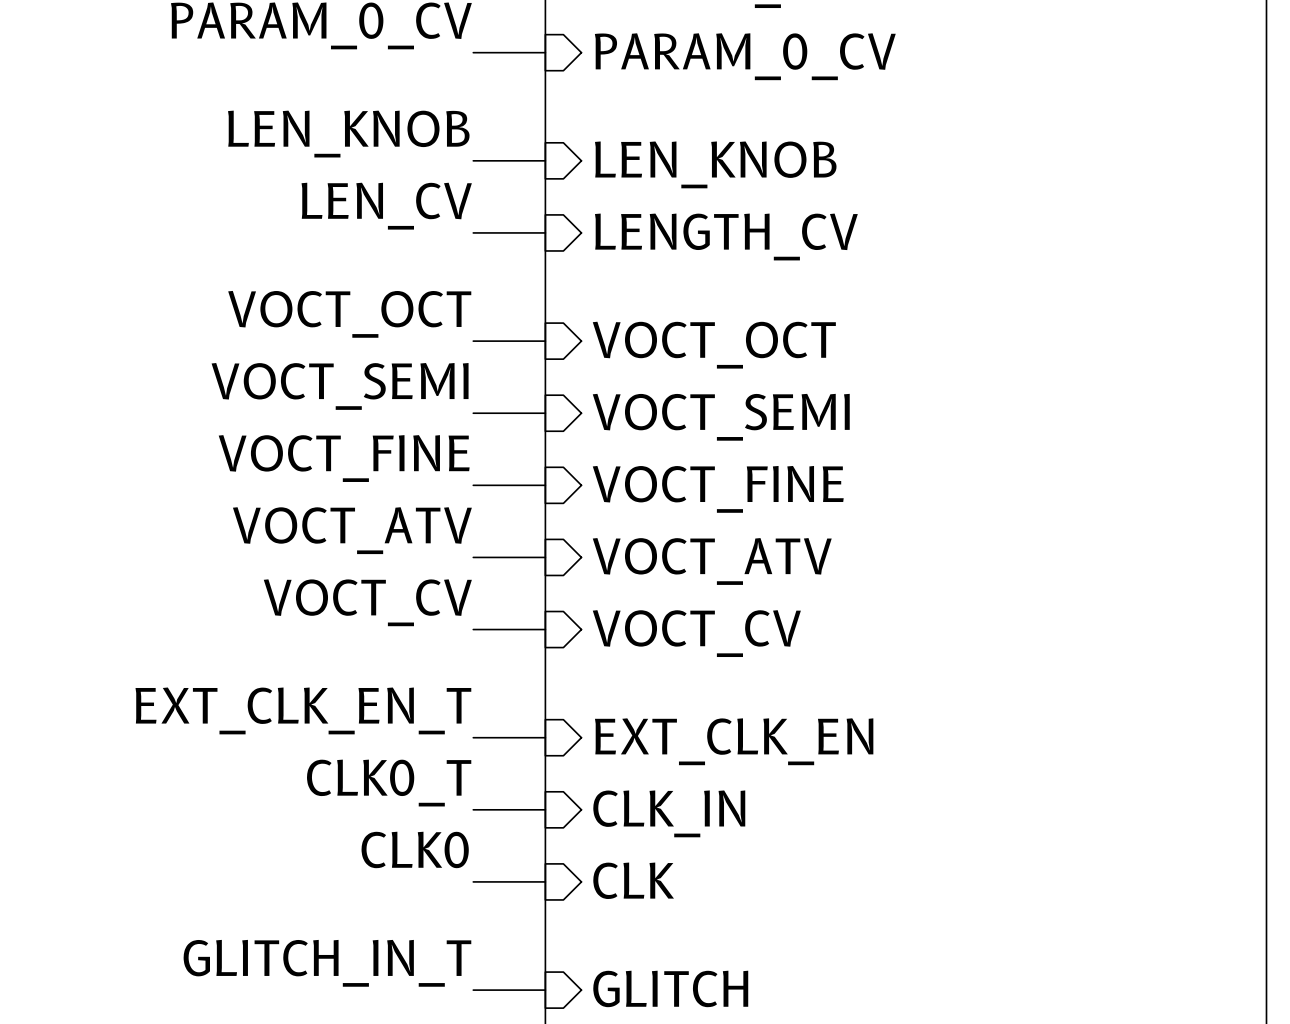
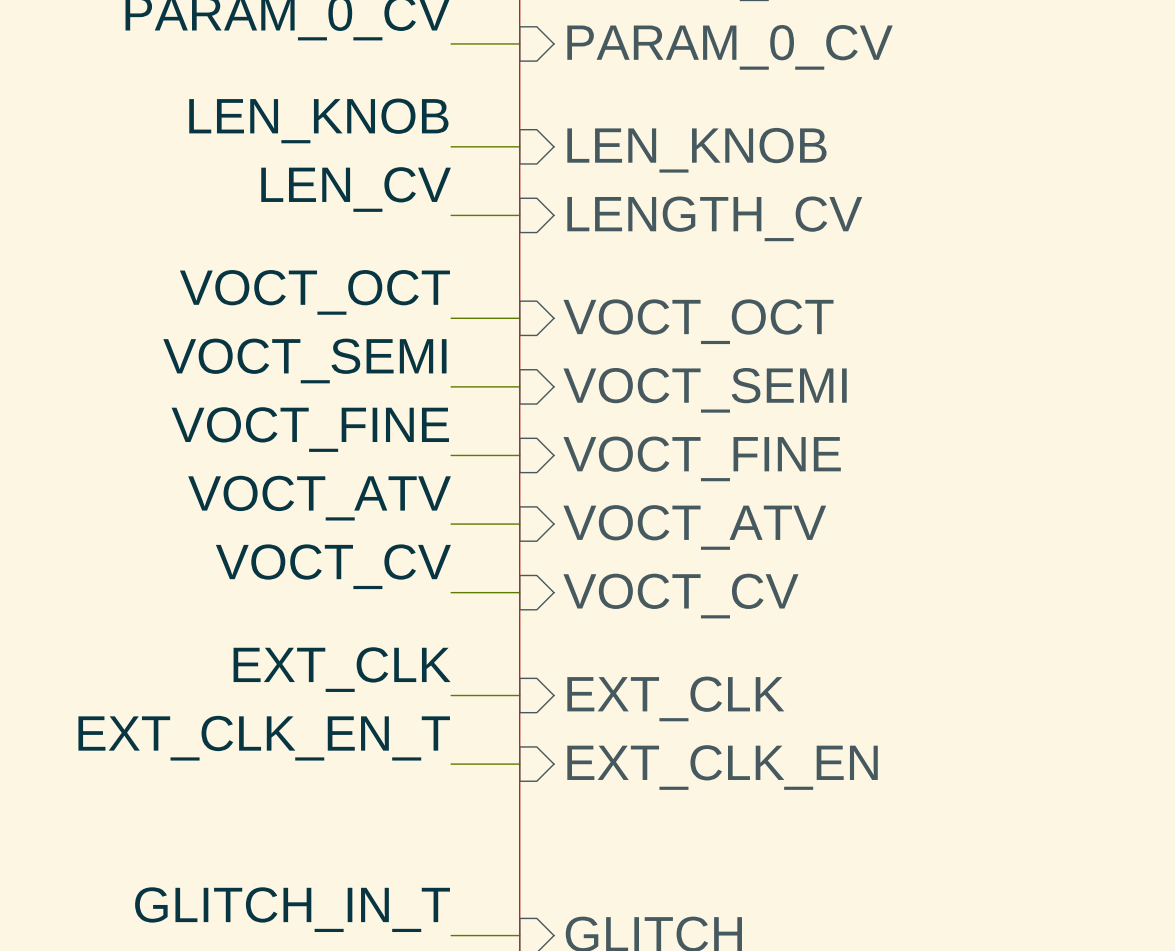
label: EXT_CLK_EN_T (303, 710) -> EXT_CLK (342, 669)
sheet pin: EXT_CLK_EN (734, 741) -> EXT_CLK (675, 698)
label: CLK0_T (389, 783) -> EXT_CLK_EN_T (264, 738)
sheet pin: CLK_IN (669, 813) -> EXT_CLK_EN (722, 767)
label: CLK0 (415, 849) -> none
sheet pin: CLK (633, 880) -> none
wire: (473, 881) (545, 881) -> none

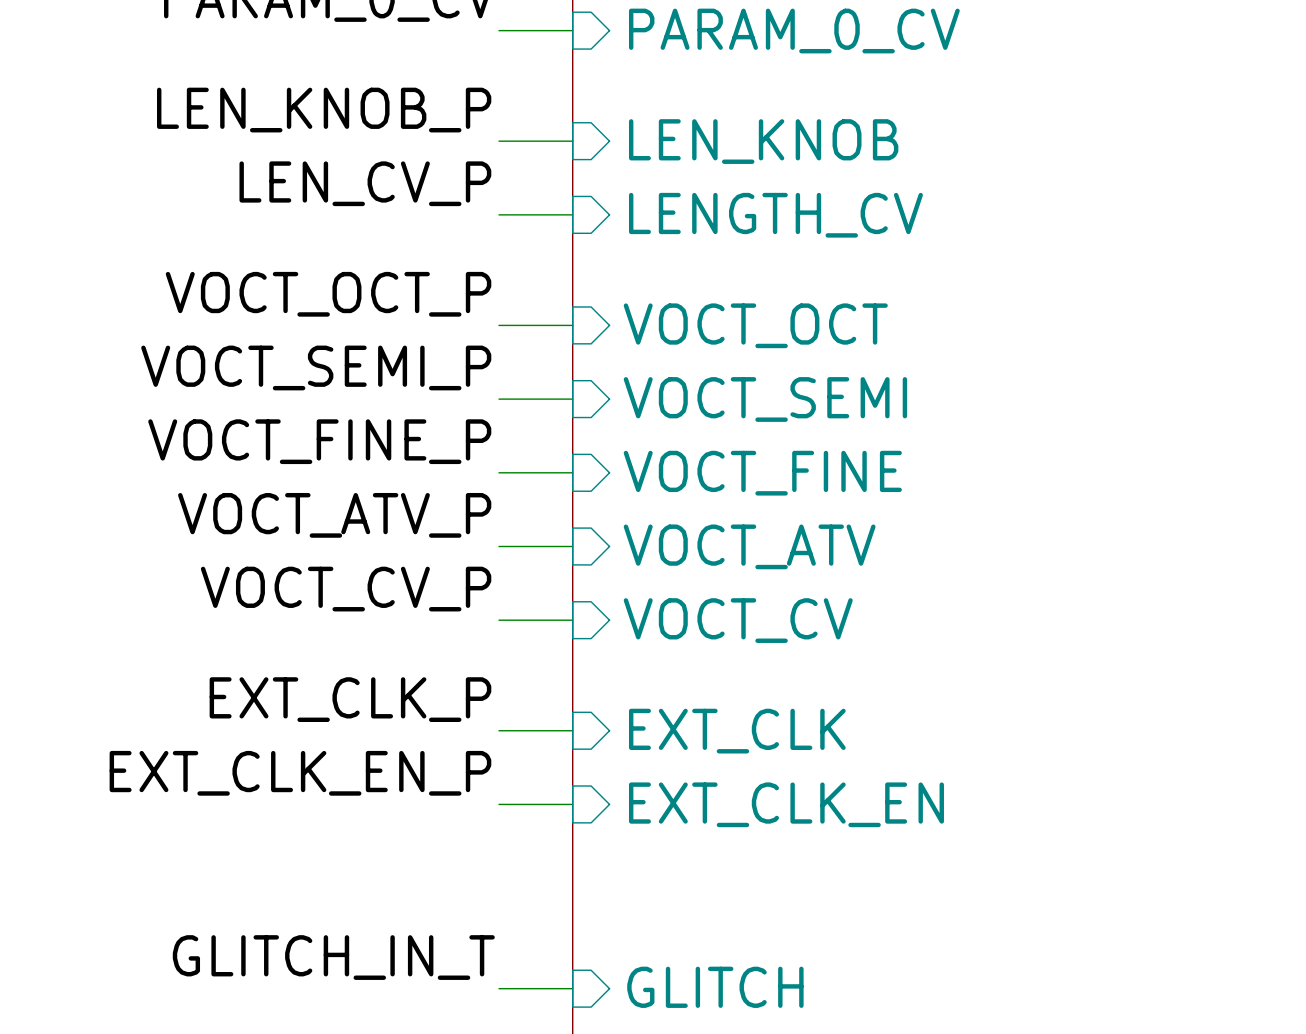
label: LEN_KNOB (318, 120) -> LEN_KNOB_P (324, 110)
label: LEN_CV (356, 189) -> LEN_CV_P (365, 183)
label: VOCT_OCT (314, 292) -> VOCT_OCT_P (328, 294)
label: VOCT_SEMI (304, 360) -> VOCT_SEMI_P (316, 367)
label: VOCT_FINE (310, 429) -> VOCT_FINE_P (319, 441)
label: VOCT_ATV (319, 498) -> VOCT_ATV_P (334, 515)
label: VOCT_CV (333, 566) -> VOCT_CV_P (346, 589)
label: EXT_CLK (342, 669) -> EXT_CLK_P (350, 699)
label: EXT_CLK_EN_T (264, 738) -> EXT_CLK_EN_P (300, 773)

